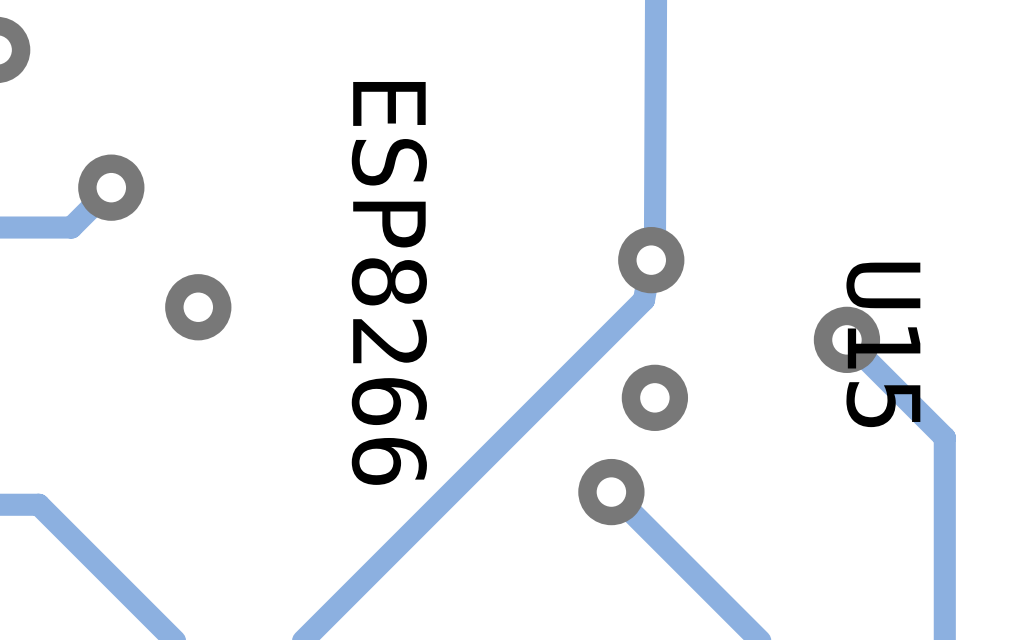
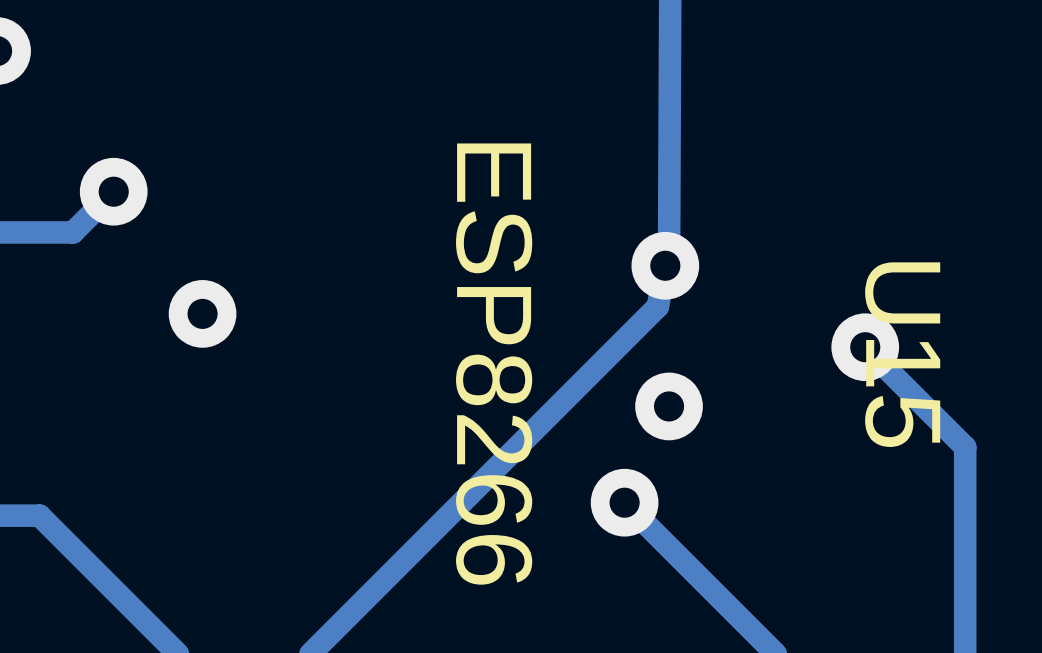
text position: ESP8266 (389, 283) -> ESP8266 (494, 364)

